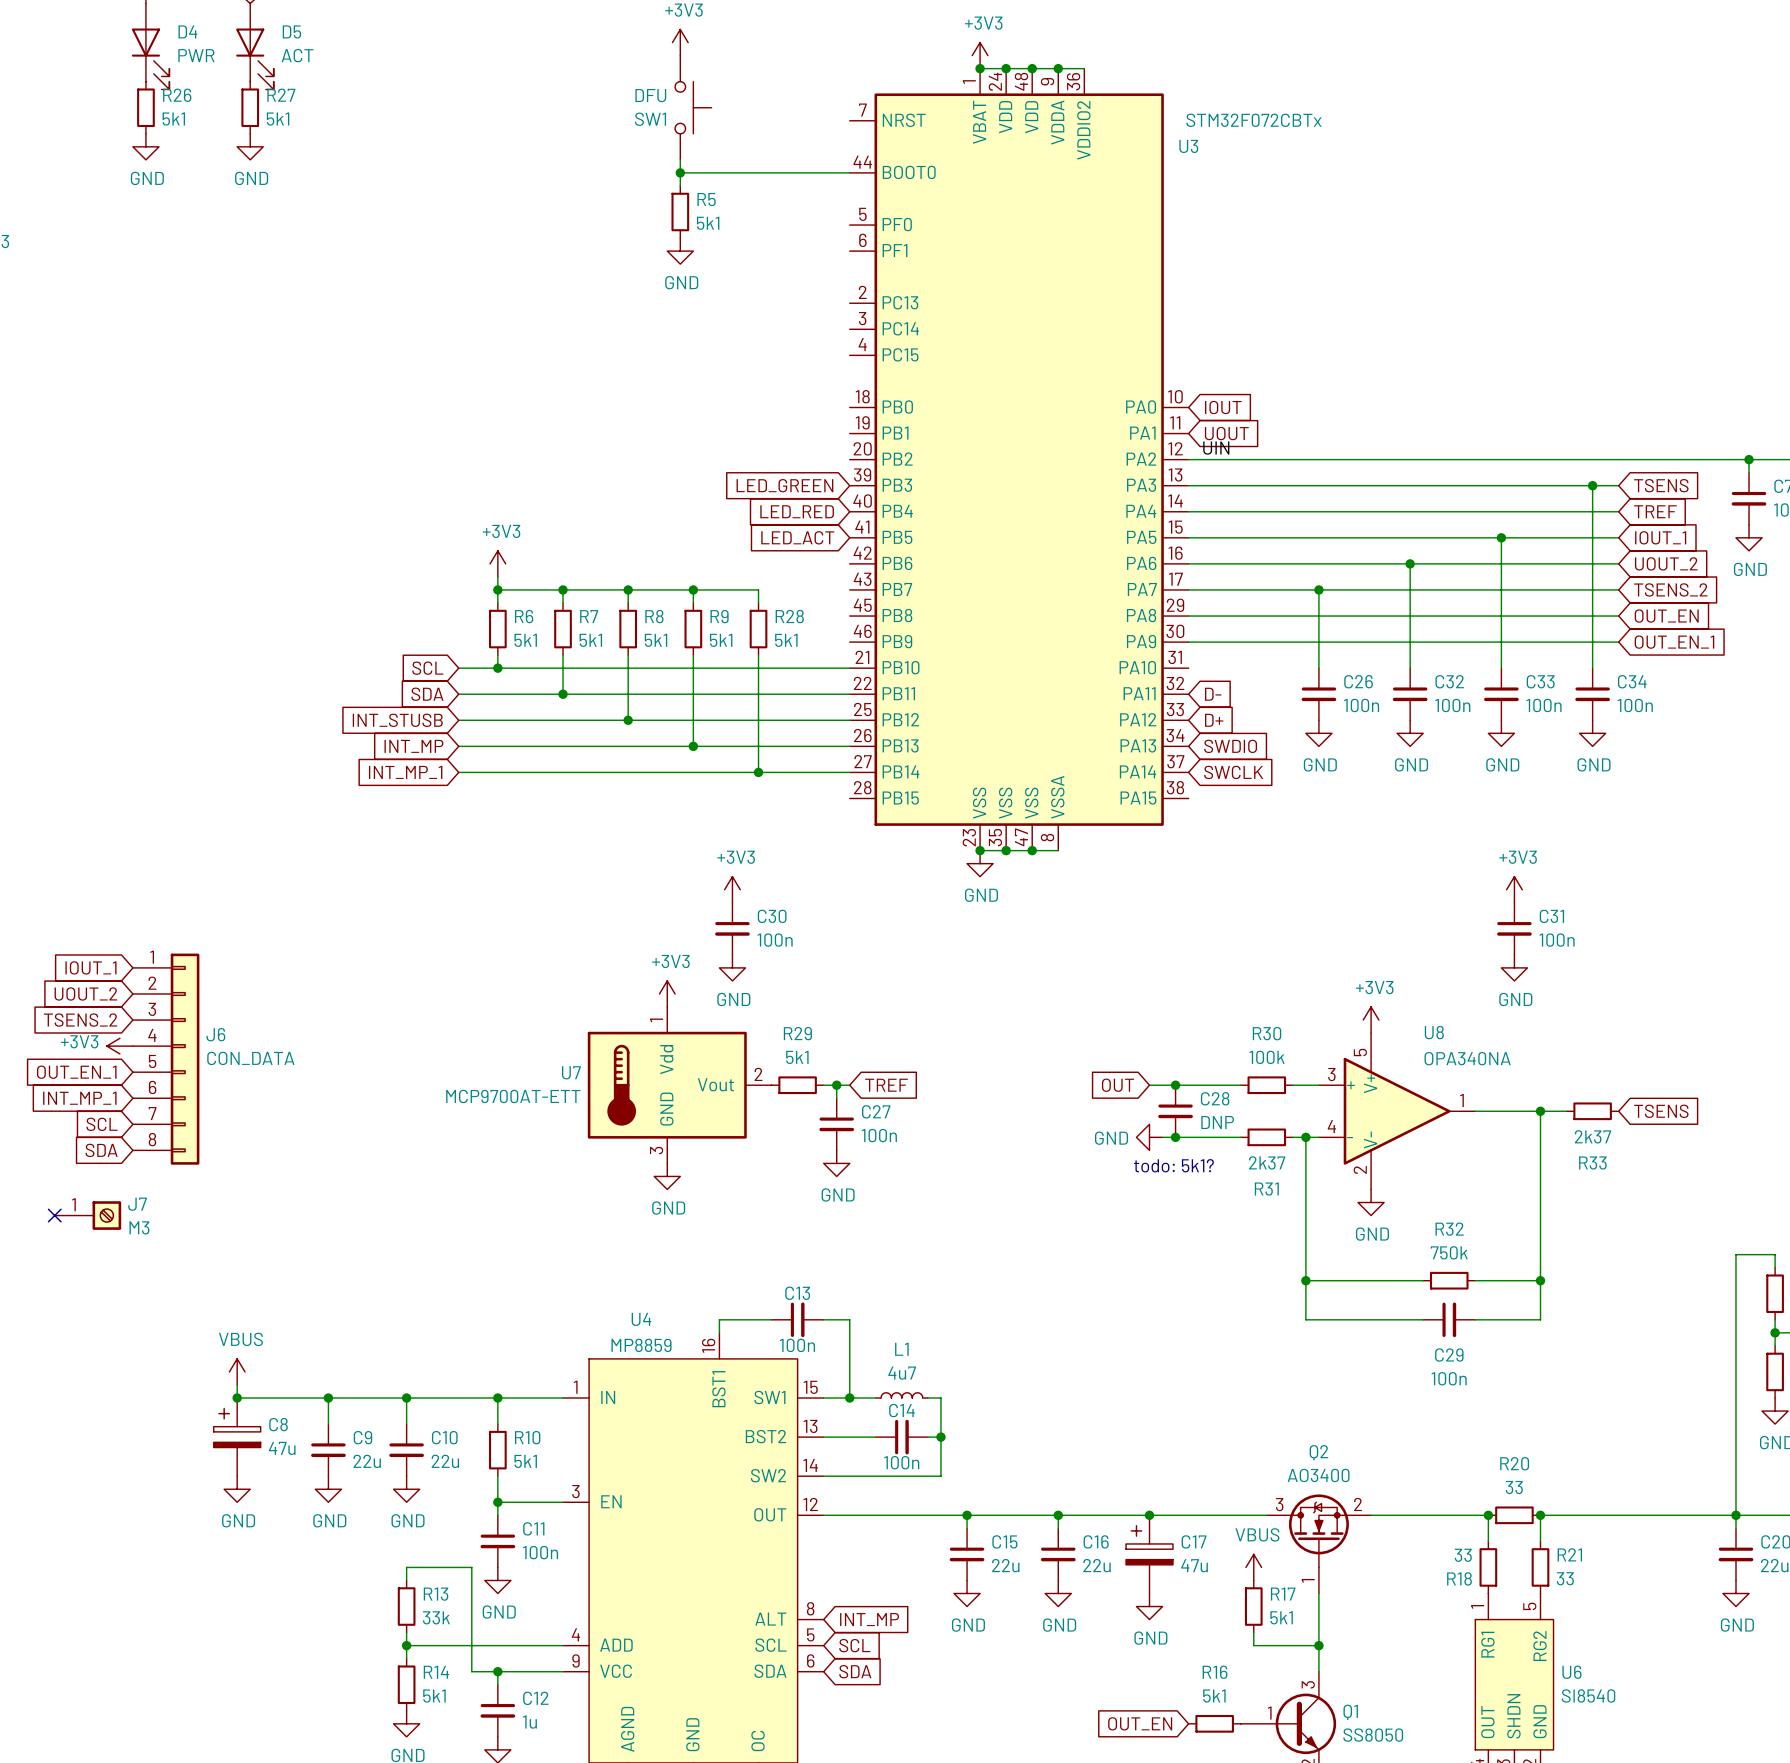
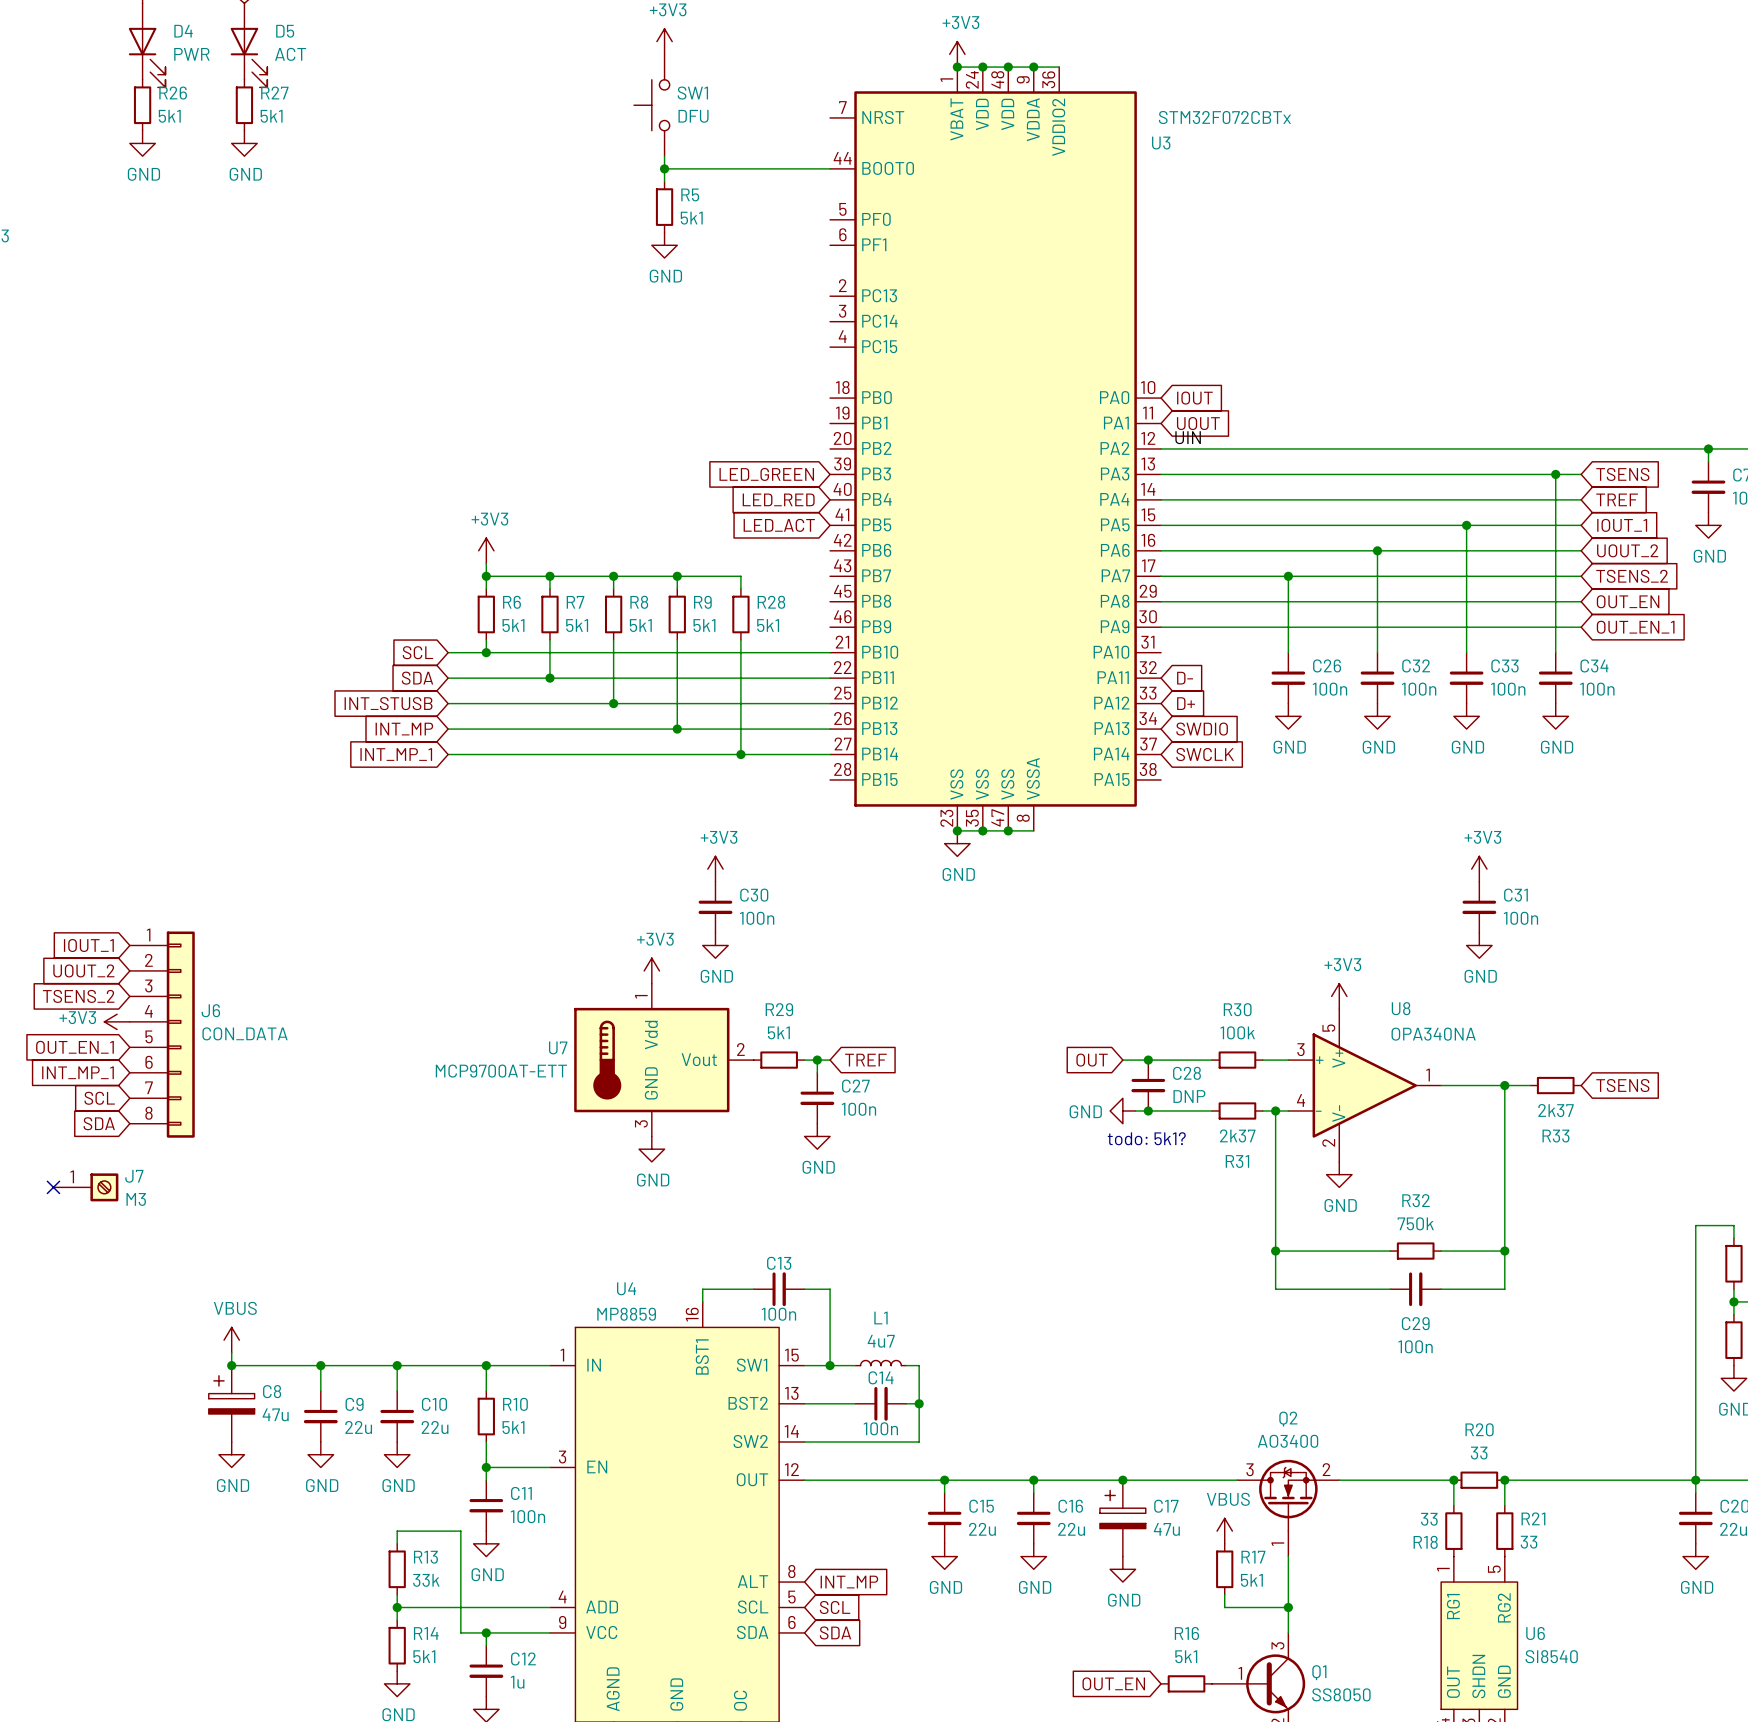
SW1 rotation: 0° (693, 107) -> 180° (651, 105)

